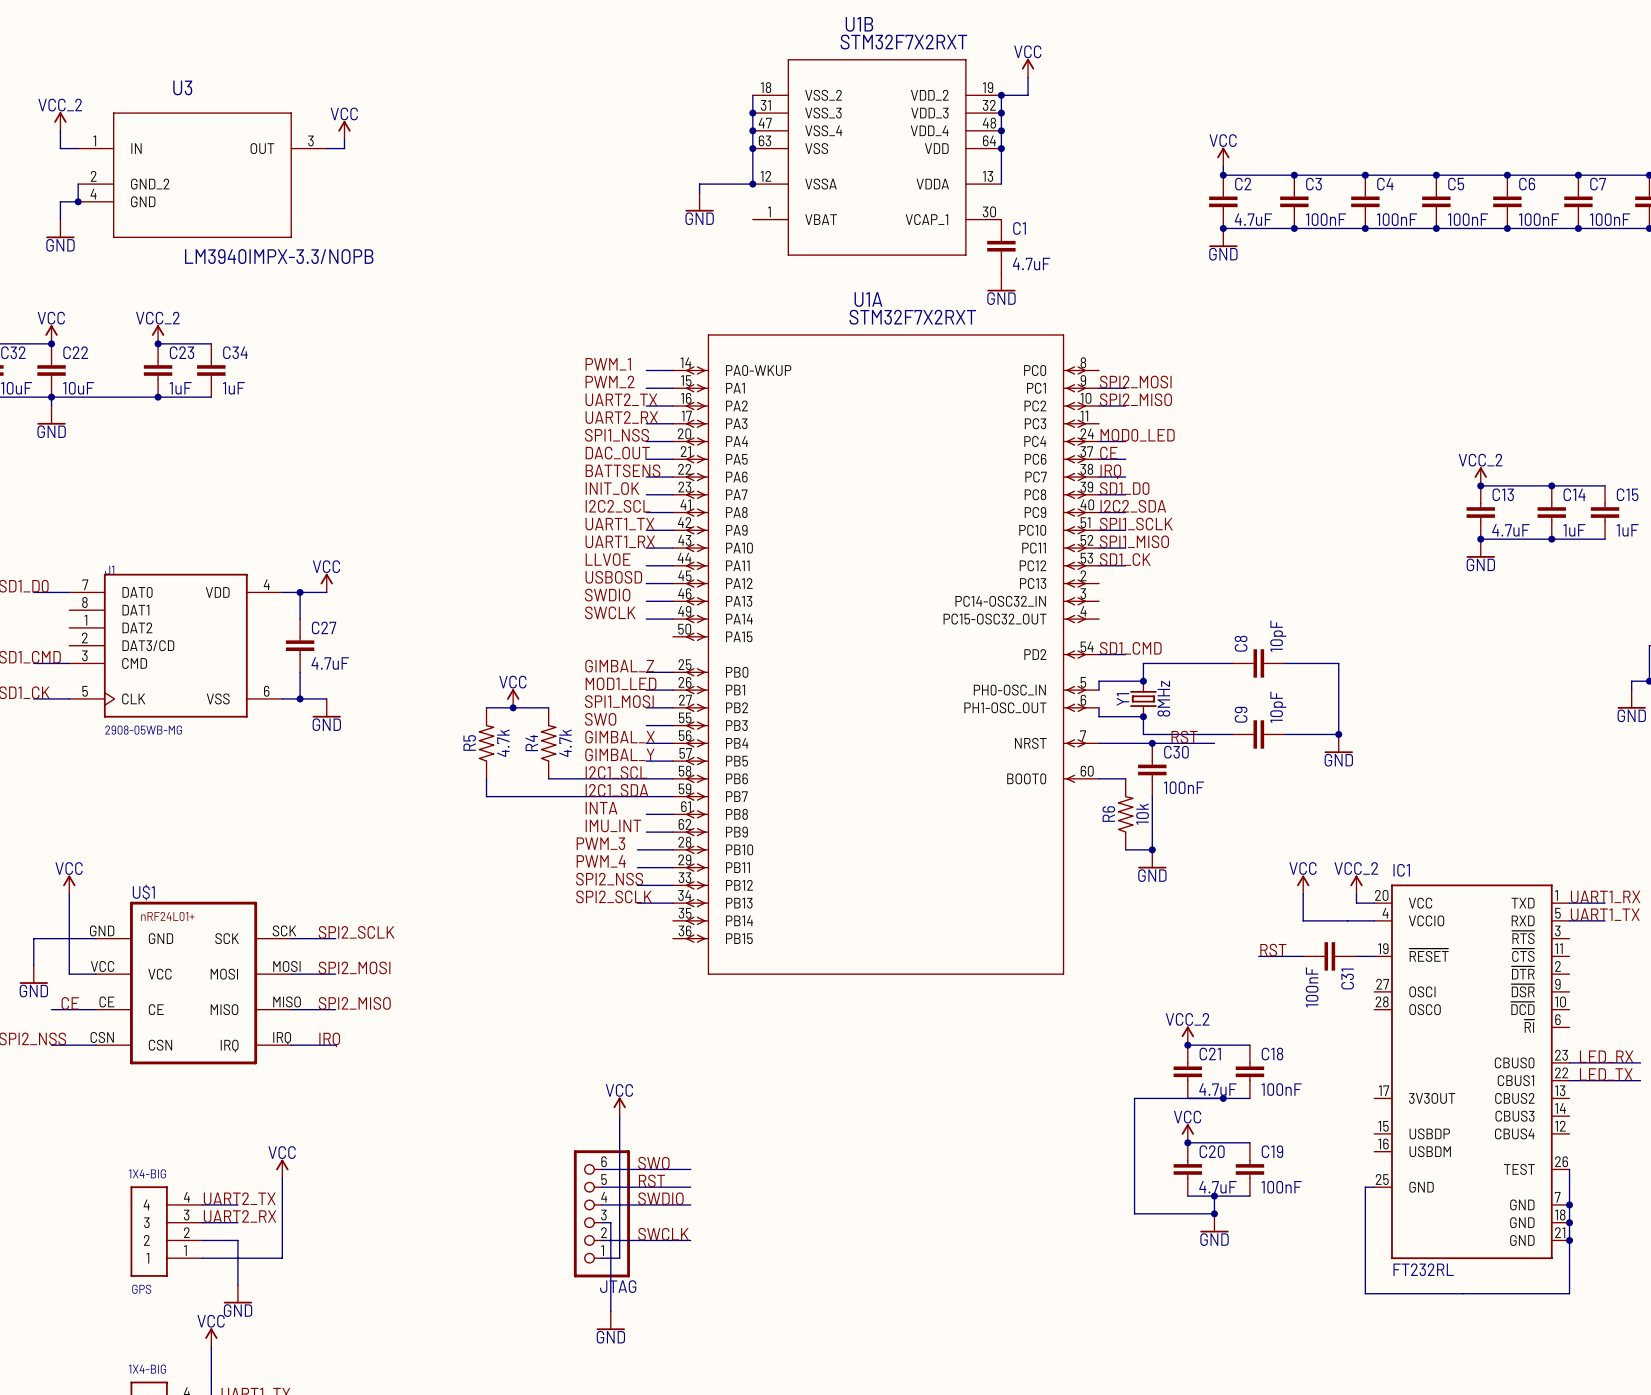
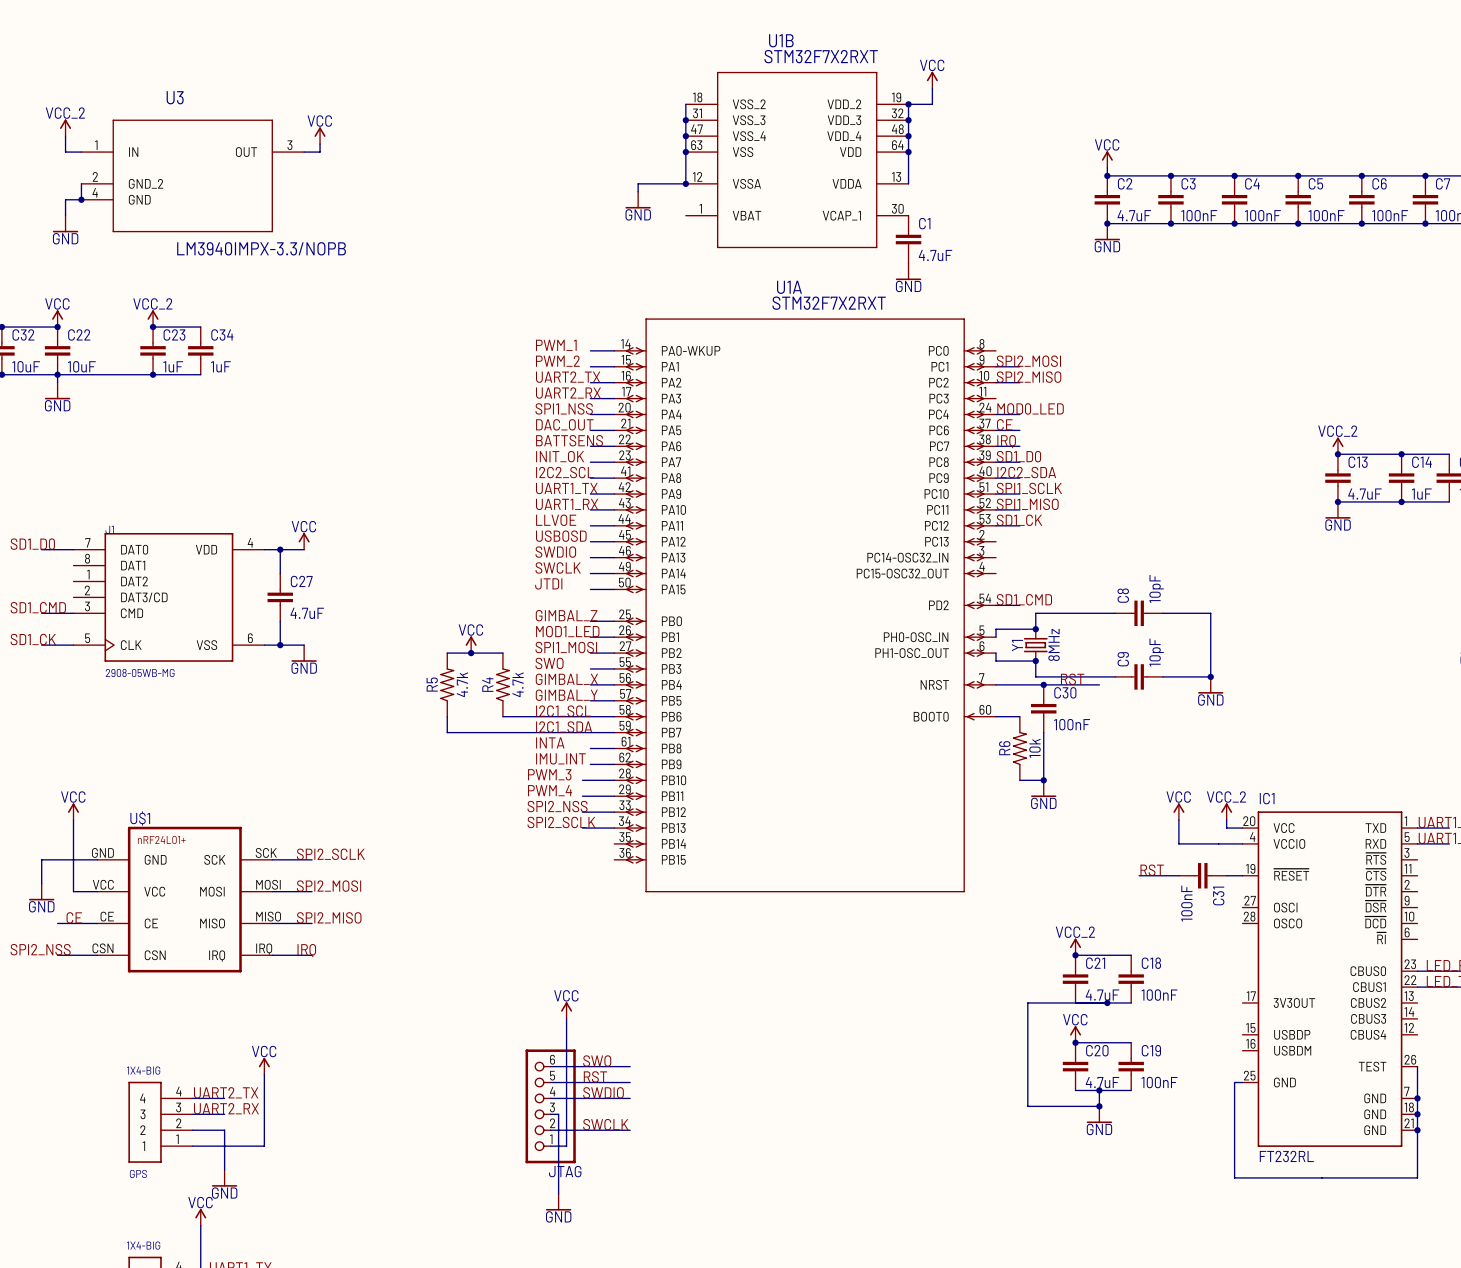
label: none -> JTDI (548, 583)
wire: none -> (590, 589) (614, 589)

